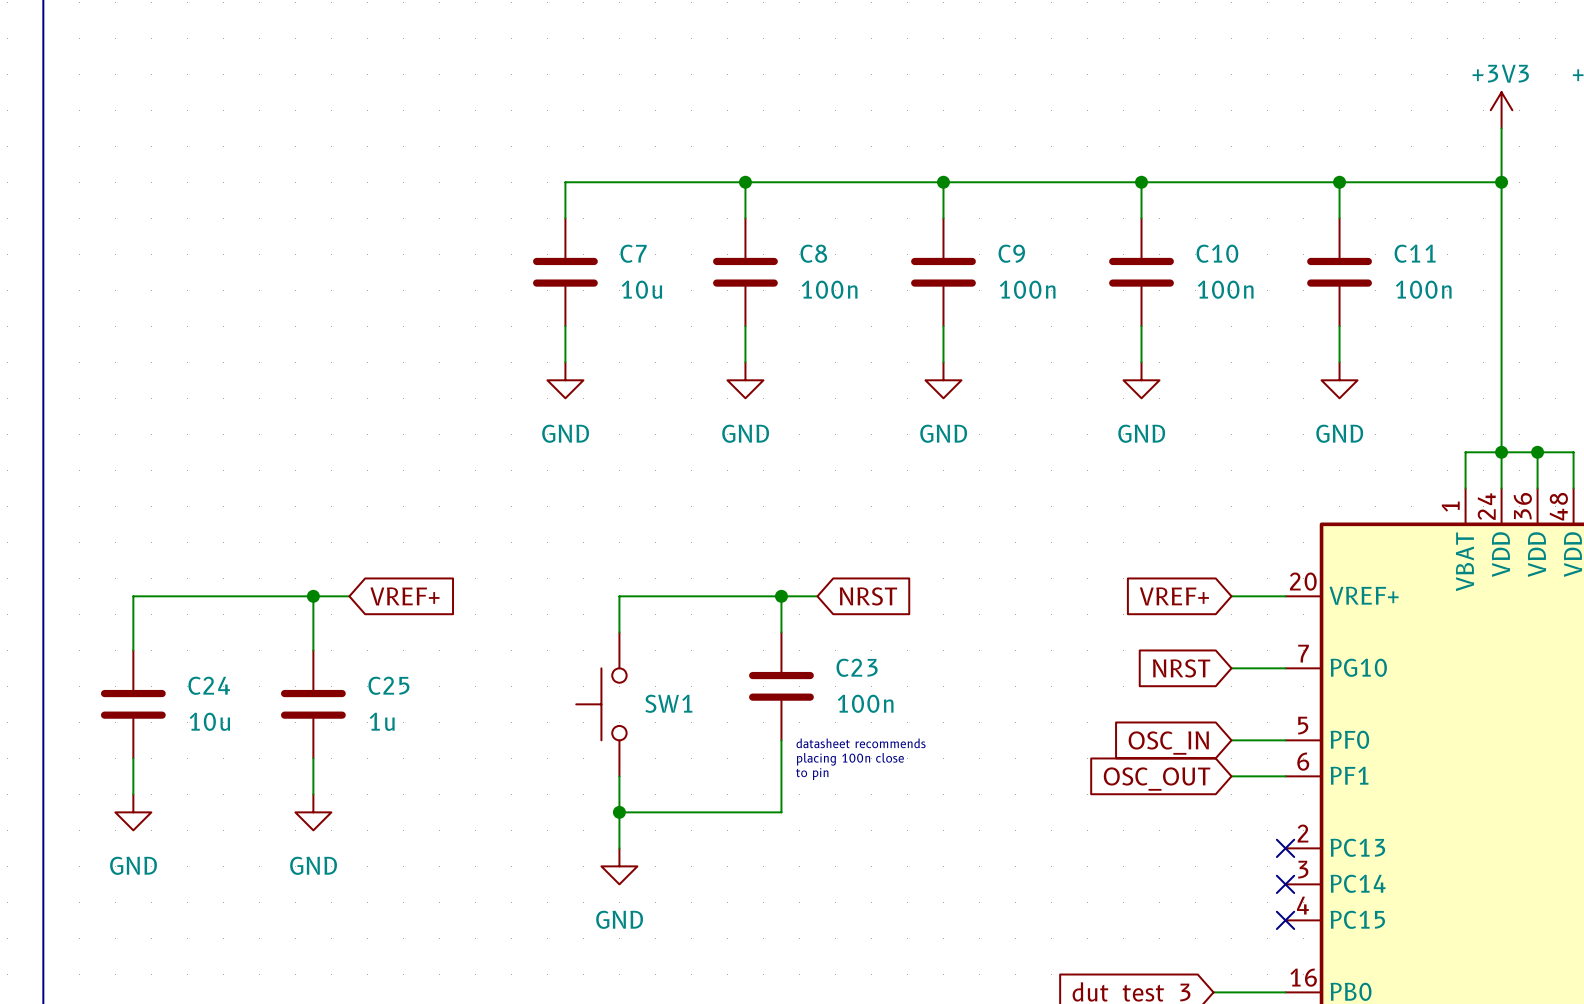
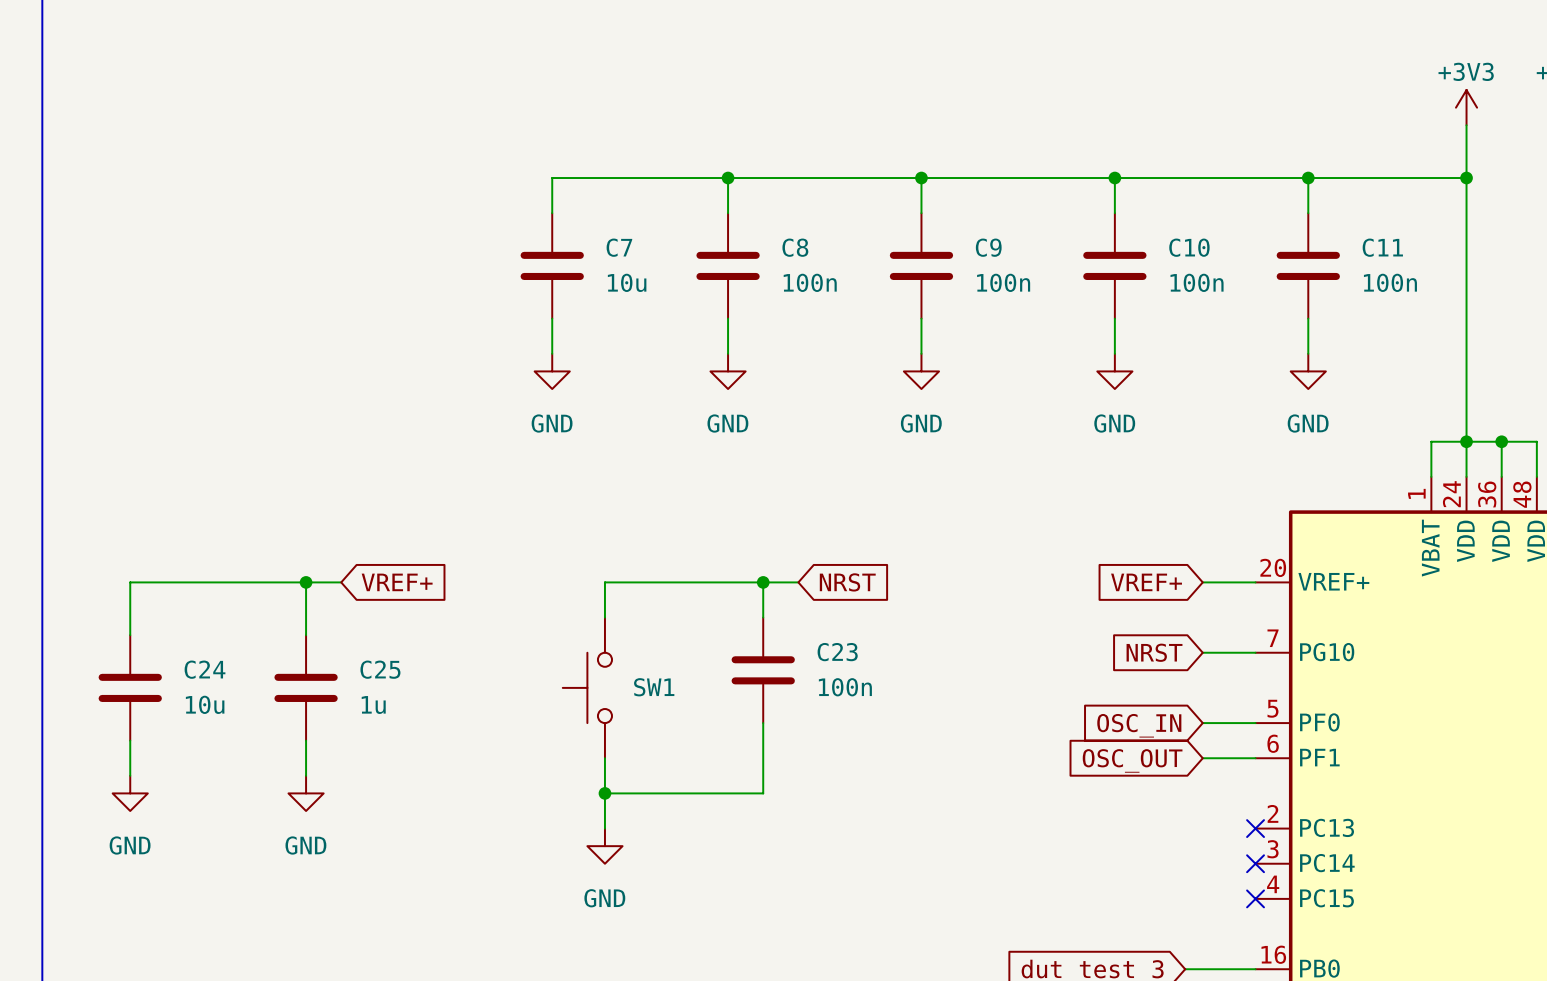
text: datasheet recommends (861, 743) -> none
text: placing 100n close (850, 759) -> none
text: to pin (812, 774) -> none

